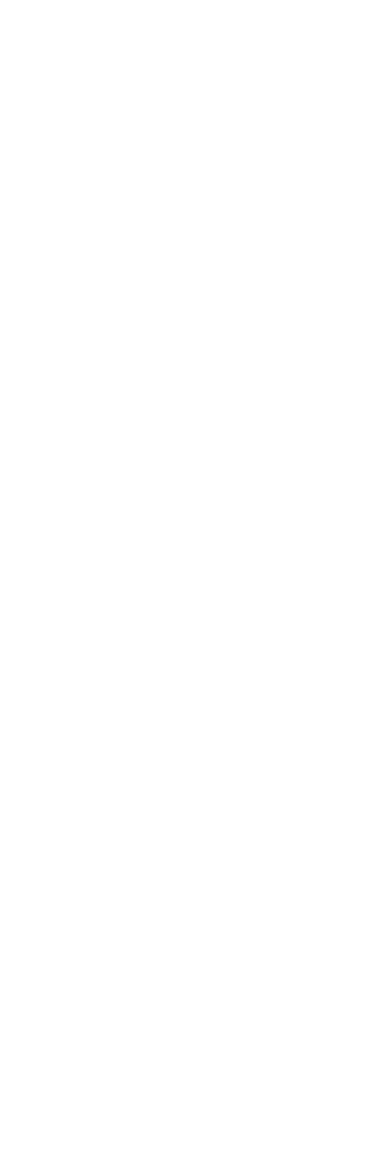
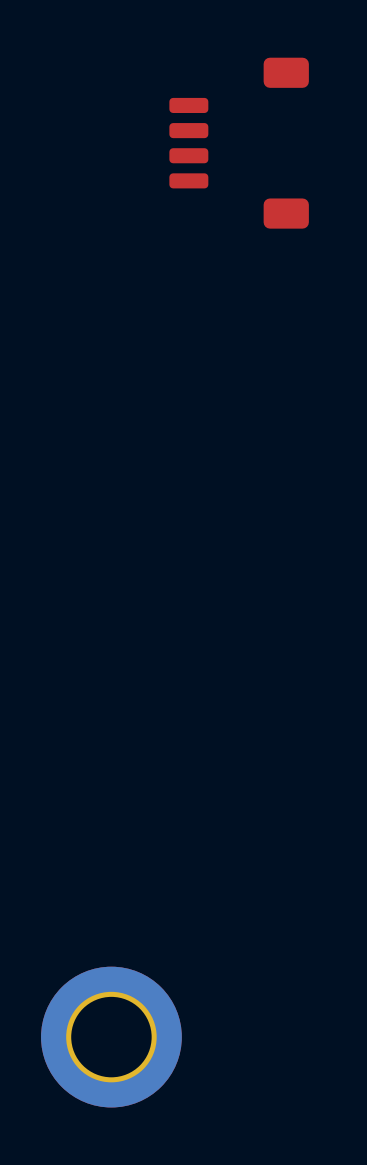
part: none -> (239, 143)
part: none -> (111, 1037)

